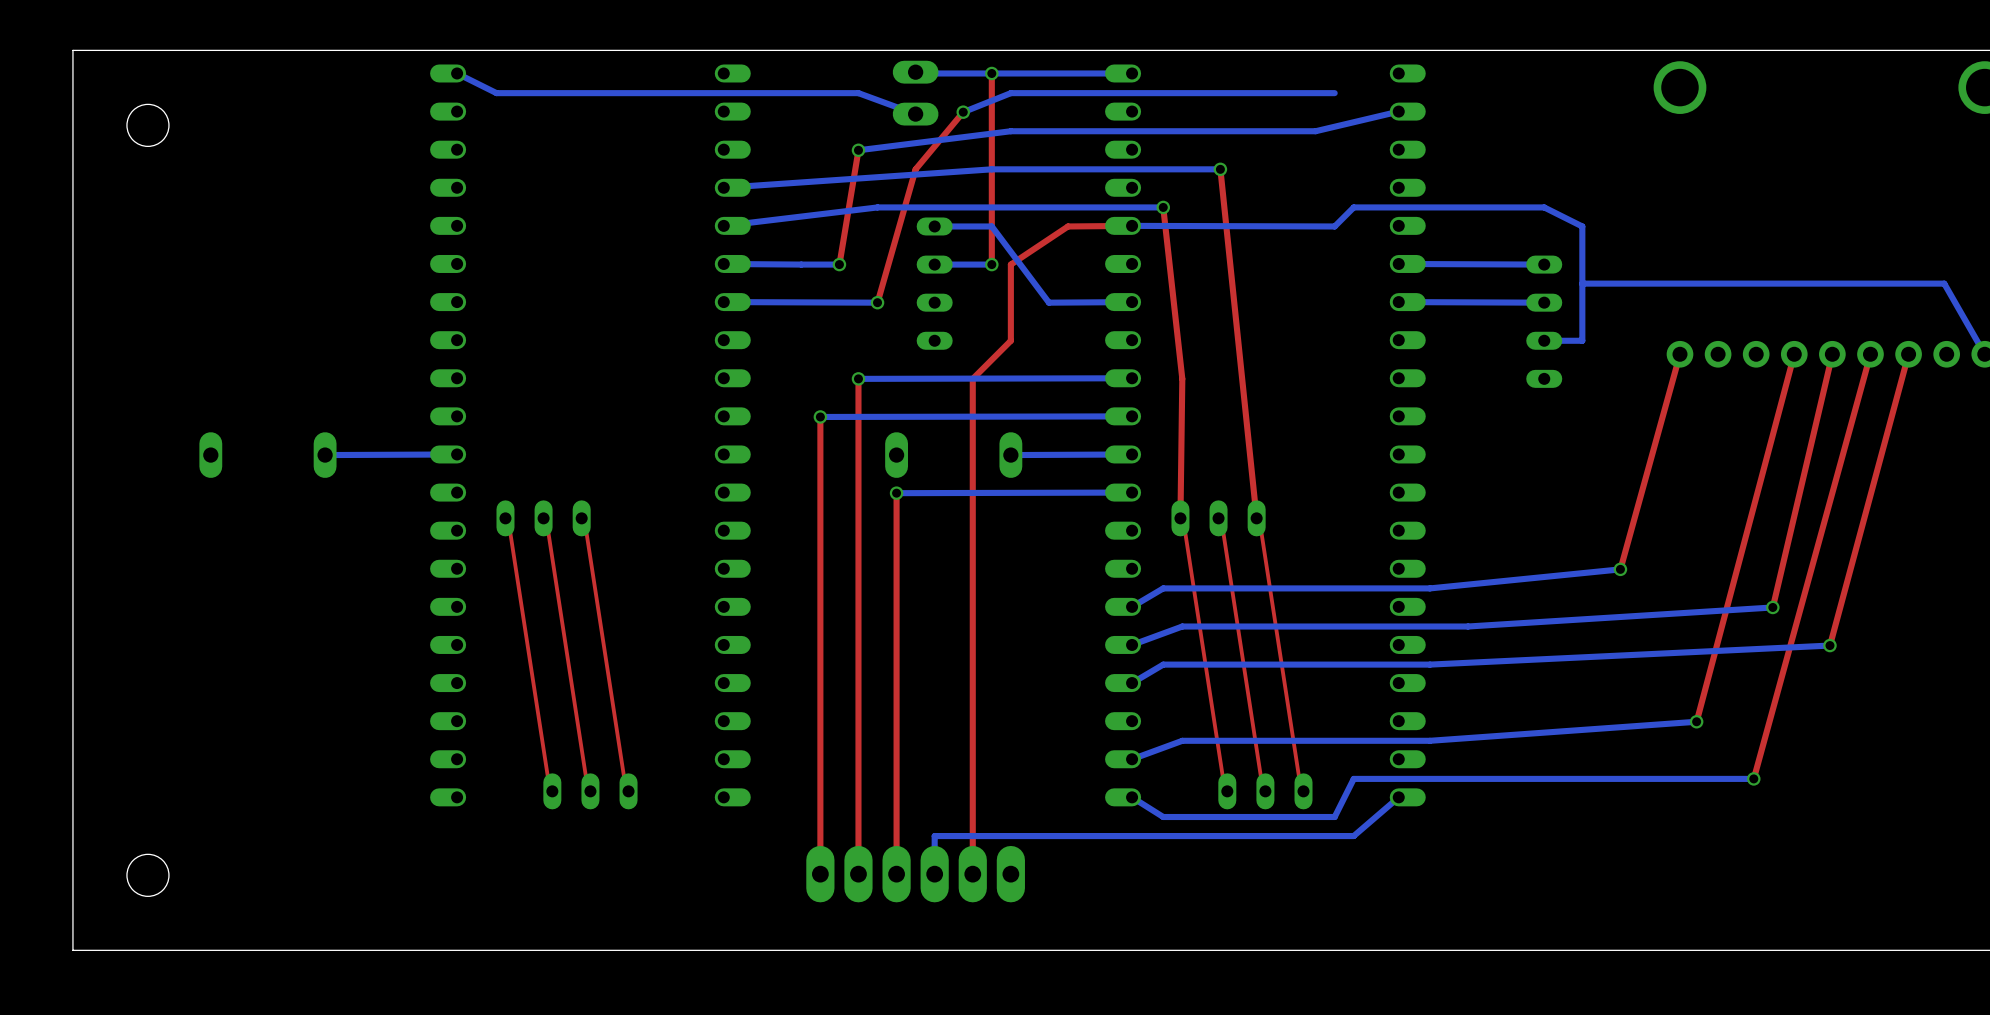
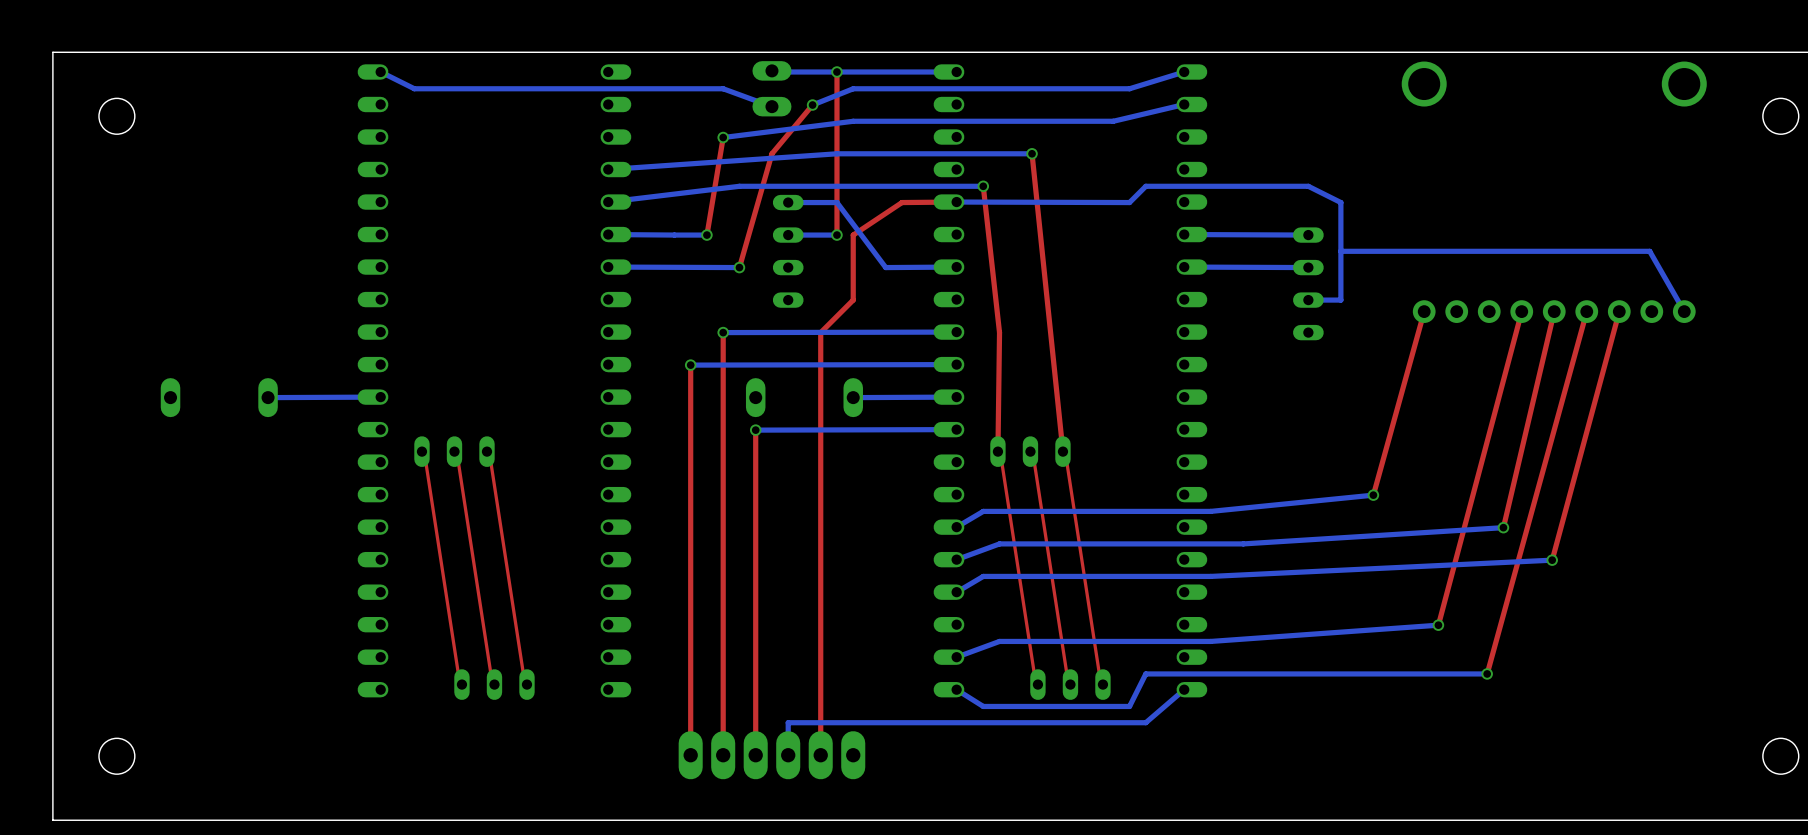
bottom track: none -> (1184, 72) (1129, 88)

